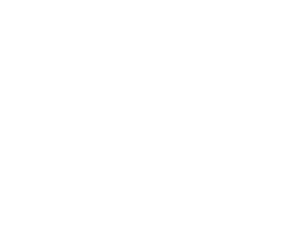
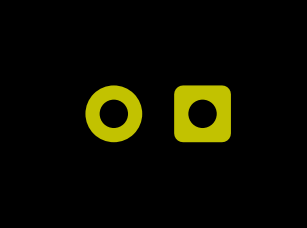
part: none -> (158, 113)

